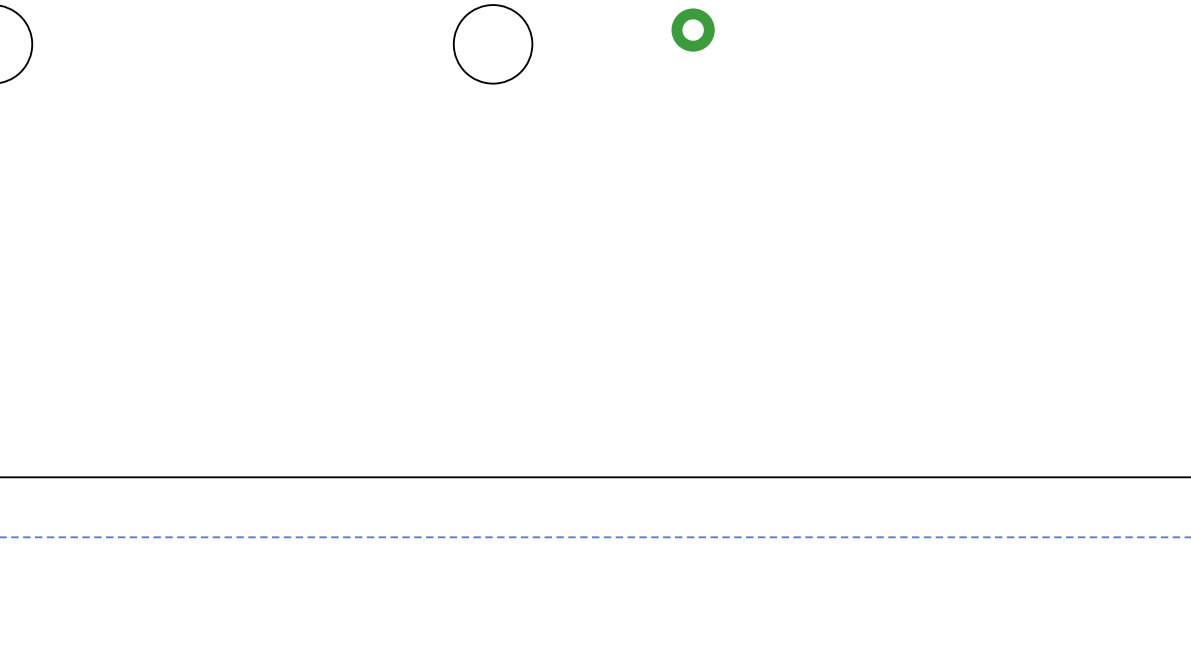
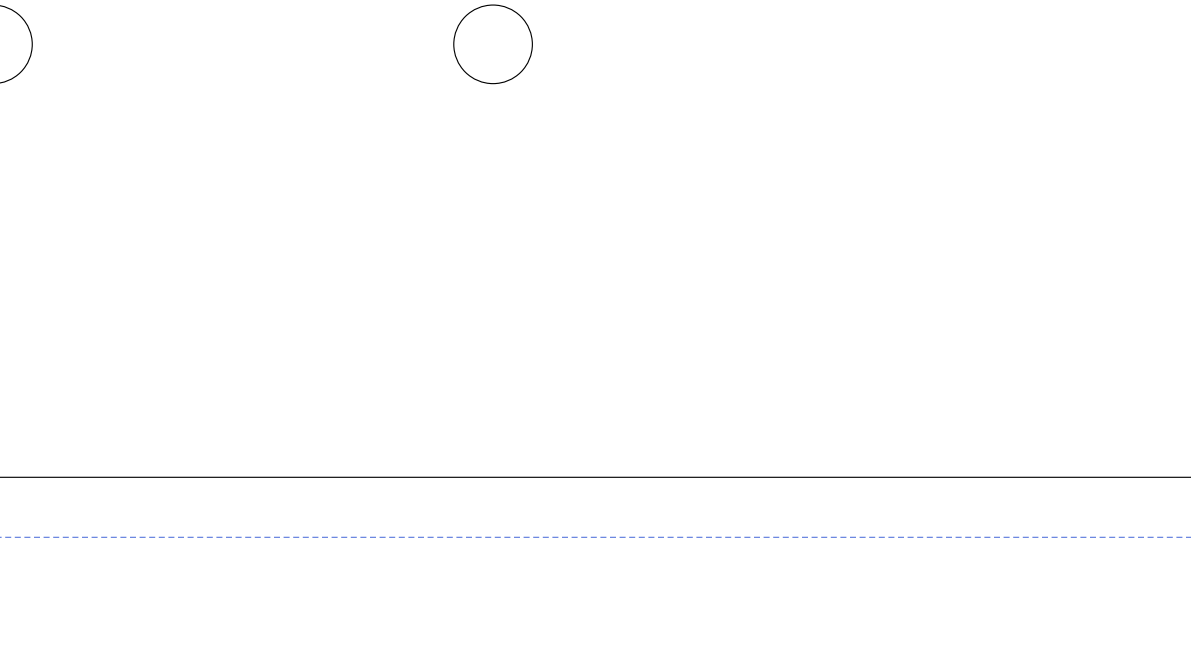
via: (693, 30) -> none

